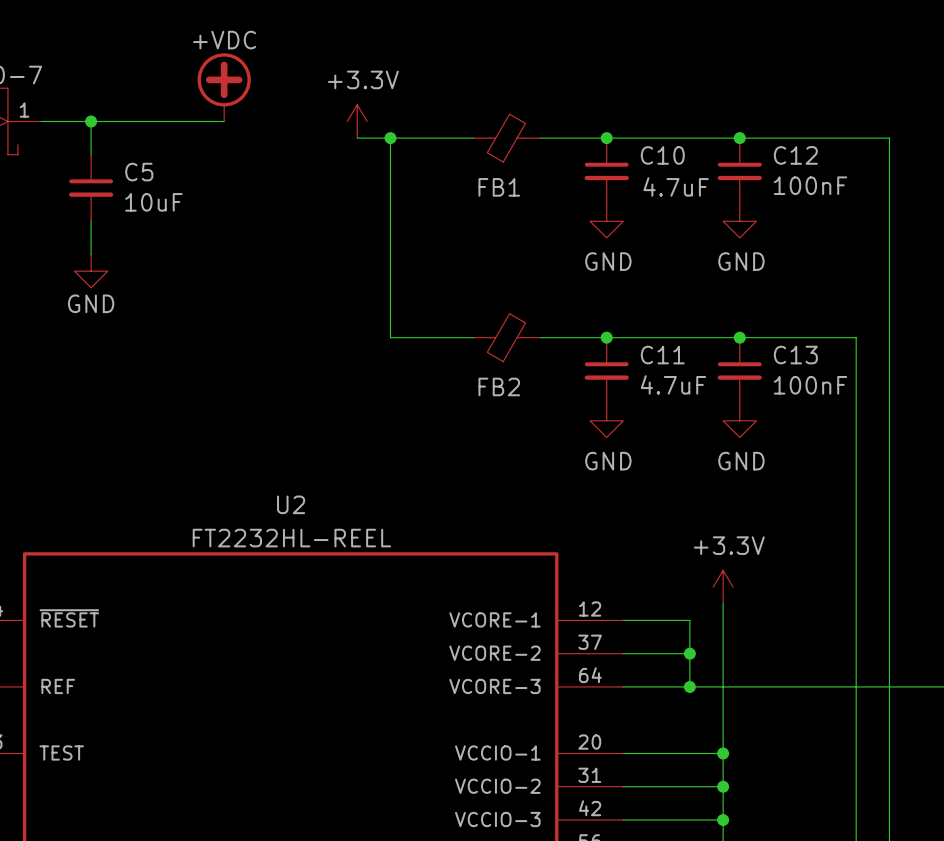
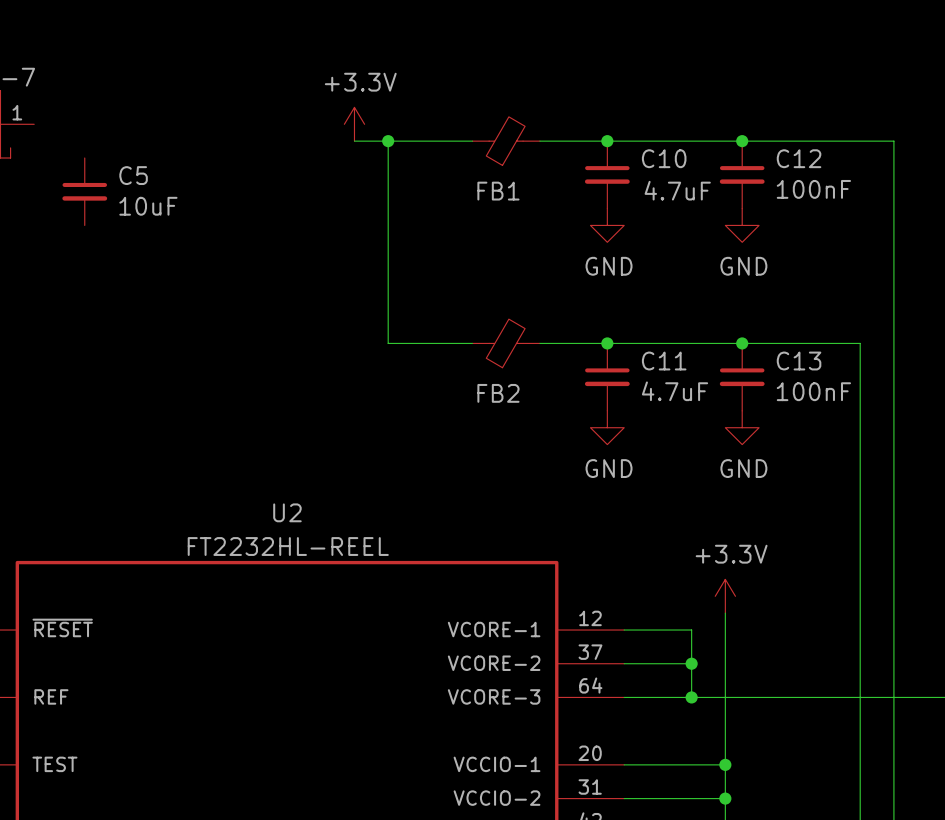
power symbol: +VDC (224, 87) -> none
wire: (41, 121) (224, 121) -> none
wire: (91, 121) (91, 154) -> none
junction: (91, 121) -> none
wire: (91, 221) (91, 254) -> none
power symbol: GND (91, 271) -> none

